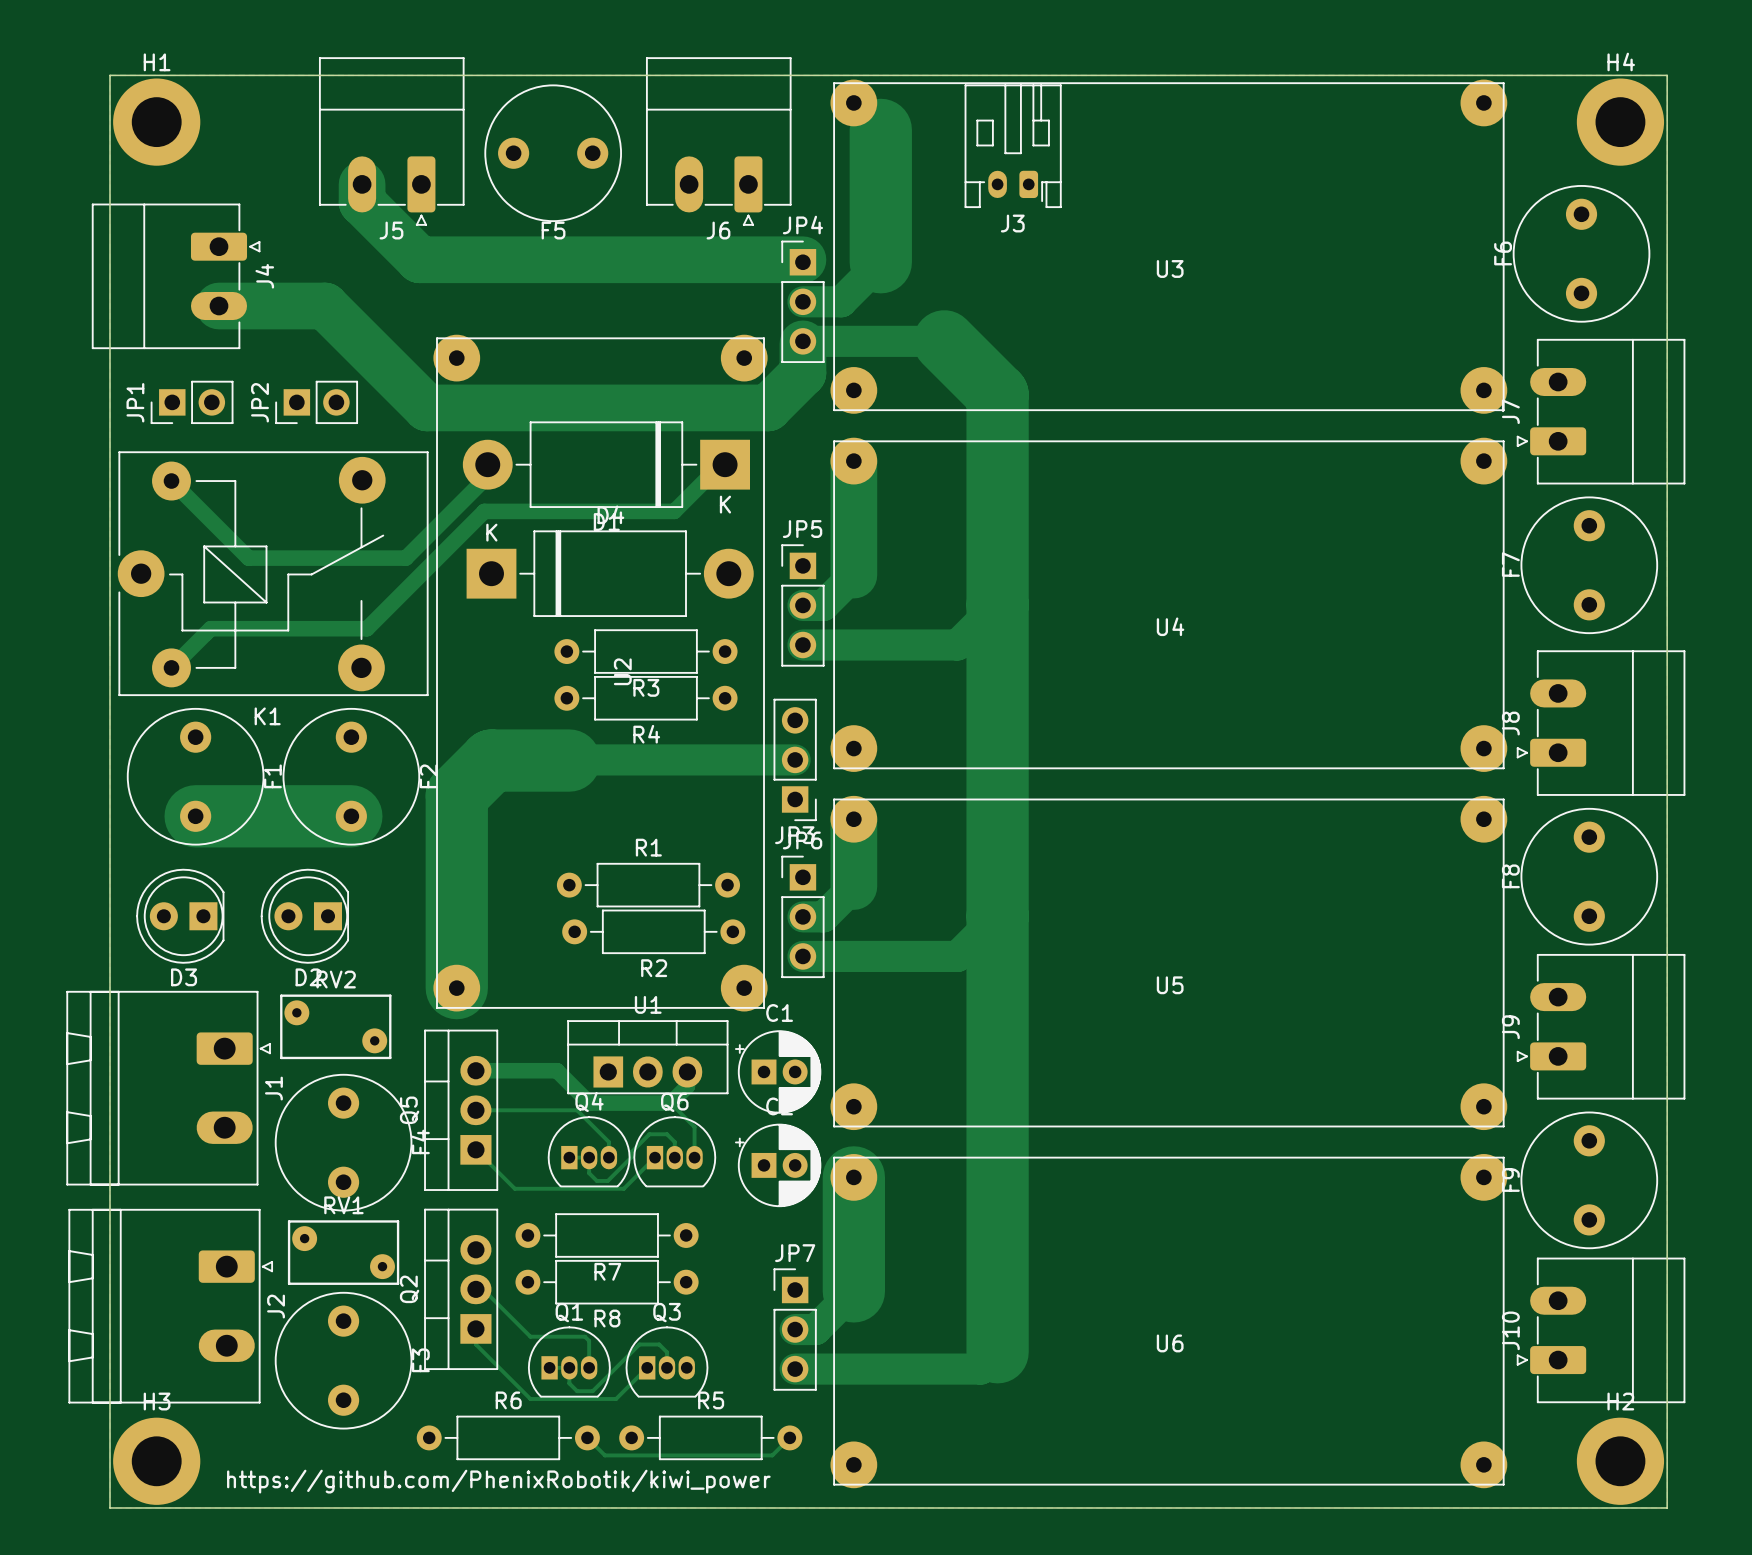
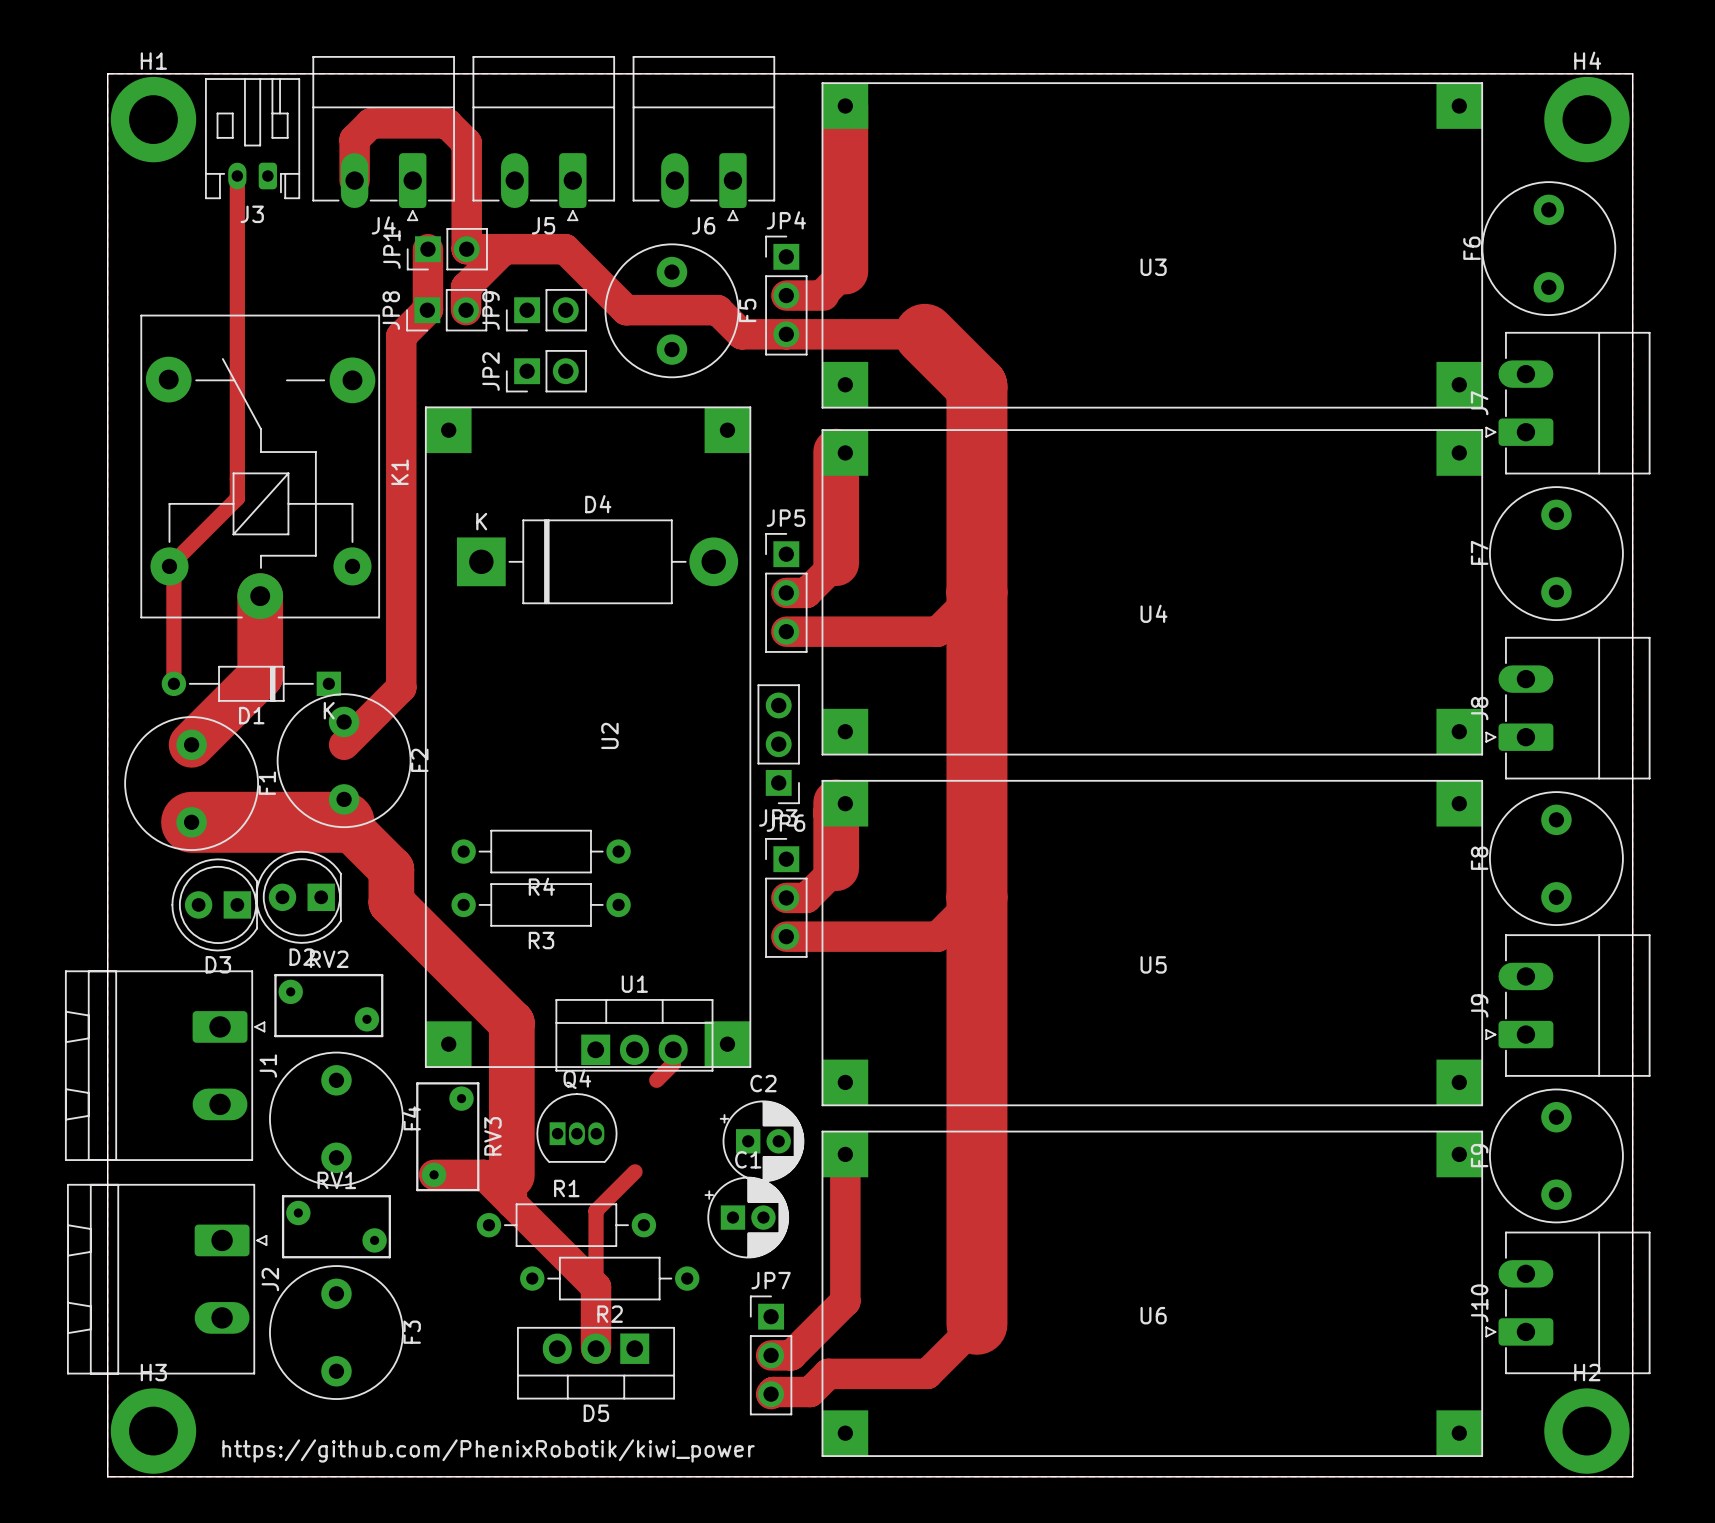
U3 footprint: [830, 79, 1508, 414] -> [821, 82, 1484, 409]
track: (853, 102) (880, 129) (880, 262) (841, 301) -> none
track: none -> (845, 106) (845, 271) (823, 293)
J5: none -> (543, 138)
J3 position: (1013, 146) -> (252, 138)
F5 rotation: 0° (553, 153) -> 90° clockwise (671, 310)
F5 position: (553, 153) -> (671, 310)
track: none -> (237, 176) (237, 498) (169, 566) (173, 570) (173, 683)
track: (362, 184) (362, 202) (419, 259) (802, 259) -> (354, 180) (354, 139) (370, 123) (447, 123) (466, 143) (466, 249) (565, 249) (626, 310) (717, 310) (741, 334) (786, 334)
J5 name: J5 (391, 230) -> J4 (383, 225)
F5 name position: F5 (553, 230) -> F5 (747, 310)
track: none -> (427, 249) (427, 309) (401, 336) (401, 687) (344, 744)
track: none -> (504, 249) (466, 287) (466, 310)
J4: (176, 276) -> none
track: (219, 306) (325, 306) (426, 407) (768, 407) (802, 373) (802, 343) -> none
JP8: none -> (446, 310)
JP9: none -> (546, 310)
U2 footprint: [433, 334, 768, 1012] -> [424, 406, 752, 1068]
JP1 position: (192, 402) -> (447, 249)
JP2 position: (316, 402) -> (546, 371)
D1 footprint: [462, 421, 750, 508] -> [161, 665, 342, 702]
U4 footprint: [830, 437, 1508, 772] -> [821, 429, 1484, 756]
track: (721, 464) (674, 511) (484, 511) (367, 628) (210, 628) (171, 667) -> none
track: (483, 472) (483, 464) (483, 480) (405, 558) (248, 558) (171, 481) -> none
K1 rotation: 0° (273, 573) -> 90° counterclockwise (260, 466)
track: none -> (260, 596) (260, 676) (191, 744)
R3 position: (645, 651) -> (541, 904)
R4 position: (645, 698) -> (541, 851)
track: (795, 759) (491, 760) (456, 795) (456, 988) -> none
F1 position: (195, 776) -> (191, 783)
U5 footprint: [830, 795, 1508, 1131] -> [821, 779, 1484, 1107]
track: (195, 816) (351, 816) -> none
track: none -> (191, 822) (344, 822) (391, 869) (391, 902) (511, 1023) (511, 1202)
R1 position: (648, 885) -> (566, 1225)
D3 position: (180, 916) -> (214, 904)
R2 position: (653, 931) -> (609, 1278)
track: (475, 1070) (557, 1070) (589, 1103) (670, 1103) (694, 1127) (694, 1157) -> none
C1 position: (778, 1071) -> (746, 1217)
Q5: (461, 1110) -> none
track: (475, 1110) (577, 1110) (608, 1142) (608, 1157) -> none
track: (475, 1149) (514, 1188) (623, 1188) (655, 1157) -> none
Q6: (674, 1151) -> none
U6 footprint: [830, 1154, 1508, 1489] -> [821, 1130, 1484, 1457]
track: (569, 1157) (589, 1157) (589, 1173) (596, 1180) (607, 1180) (631, 1157) (631, 1152) (649, 1134) (666, 1134) (674, 1142) (674, 1157) -> none
RV3: none -> (447, 1136)
track: (853, 1177) (853, 1291) (815, 1329) (795, 1329) -> none
track: none -> (845, 1154) (845, 1301) (791, 1355) (771, 1355)
track: none -> (635, 1171) (596, 1210) (596, 1348) (596, 1287) (483, 1174) (434, 1174)
R7: (607, 1235) -> none
R8: (607, 1282) -> none
Q2: (461, 1289) -> none
track: (475, 1289) (483, 1289) (530, 1336) (584, 1336) (589, 1340) (589, 1367) -> none
track: (475, 1328) (475, 1344) (530, 1398) (616, 1398) (647, 1367) -> none
JP7 position: (795, 1329) -> (771, 1355)
Q1: (569, 1362) -> none
Q3: (666, 1362) -> none
track: (549, 1367) (569, 1367) (569, 1383) (577, 1391) (592, 1391) (639, 1344) (659, 1344) (666, 1352) (666, 1367) -> none
track: (795, 1369) (980, 1369) -> (771, 1394) (773, 1392) (810, 1392) (828, 1373) (927, 1373) (960, 1340)
D5: none -> (596, 1363)
R6: (508, 1437) -> none
track: (587, 1437) (604, 1455) (772, 1455) (789, 1437) -> none
R5: (710, 1437) -> none

